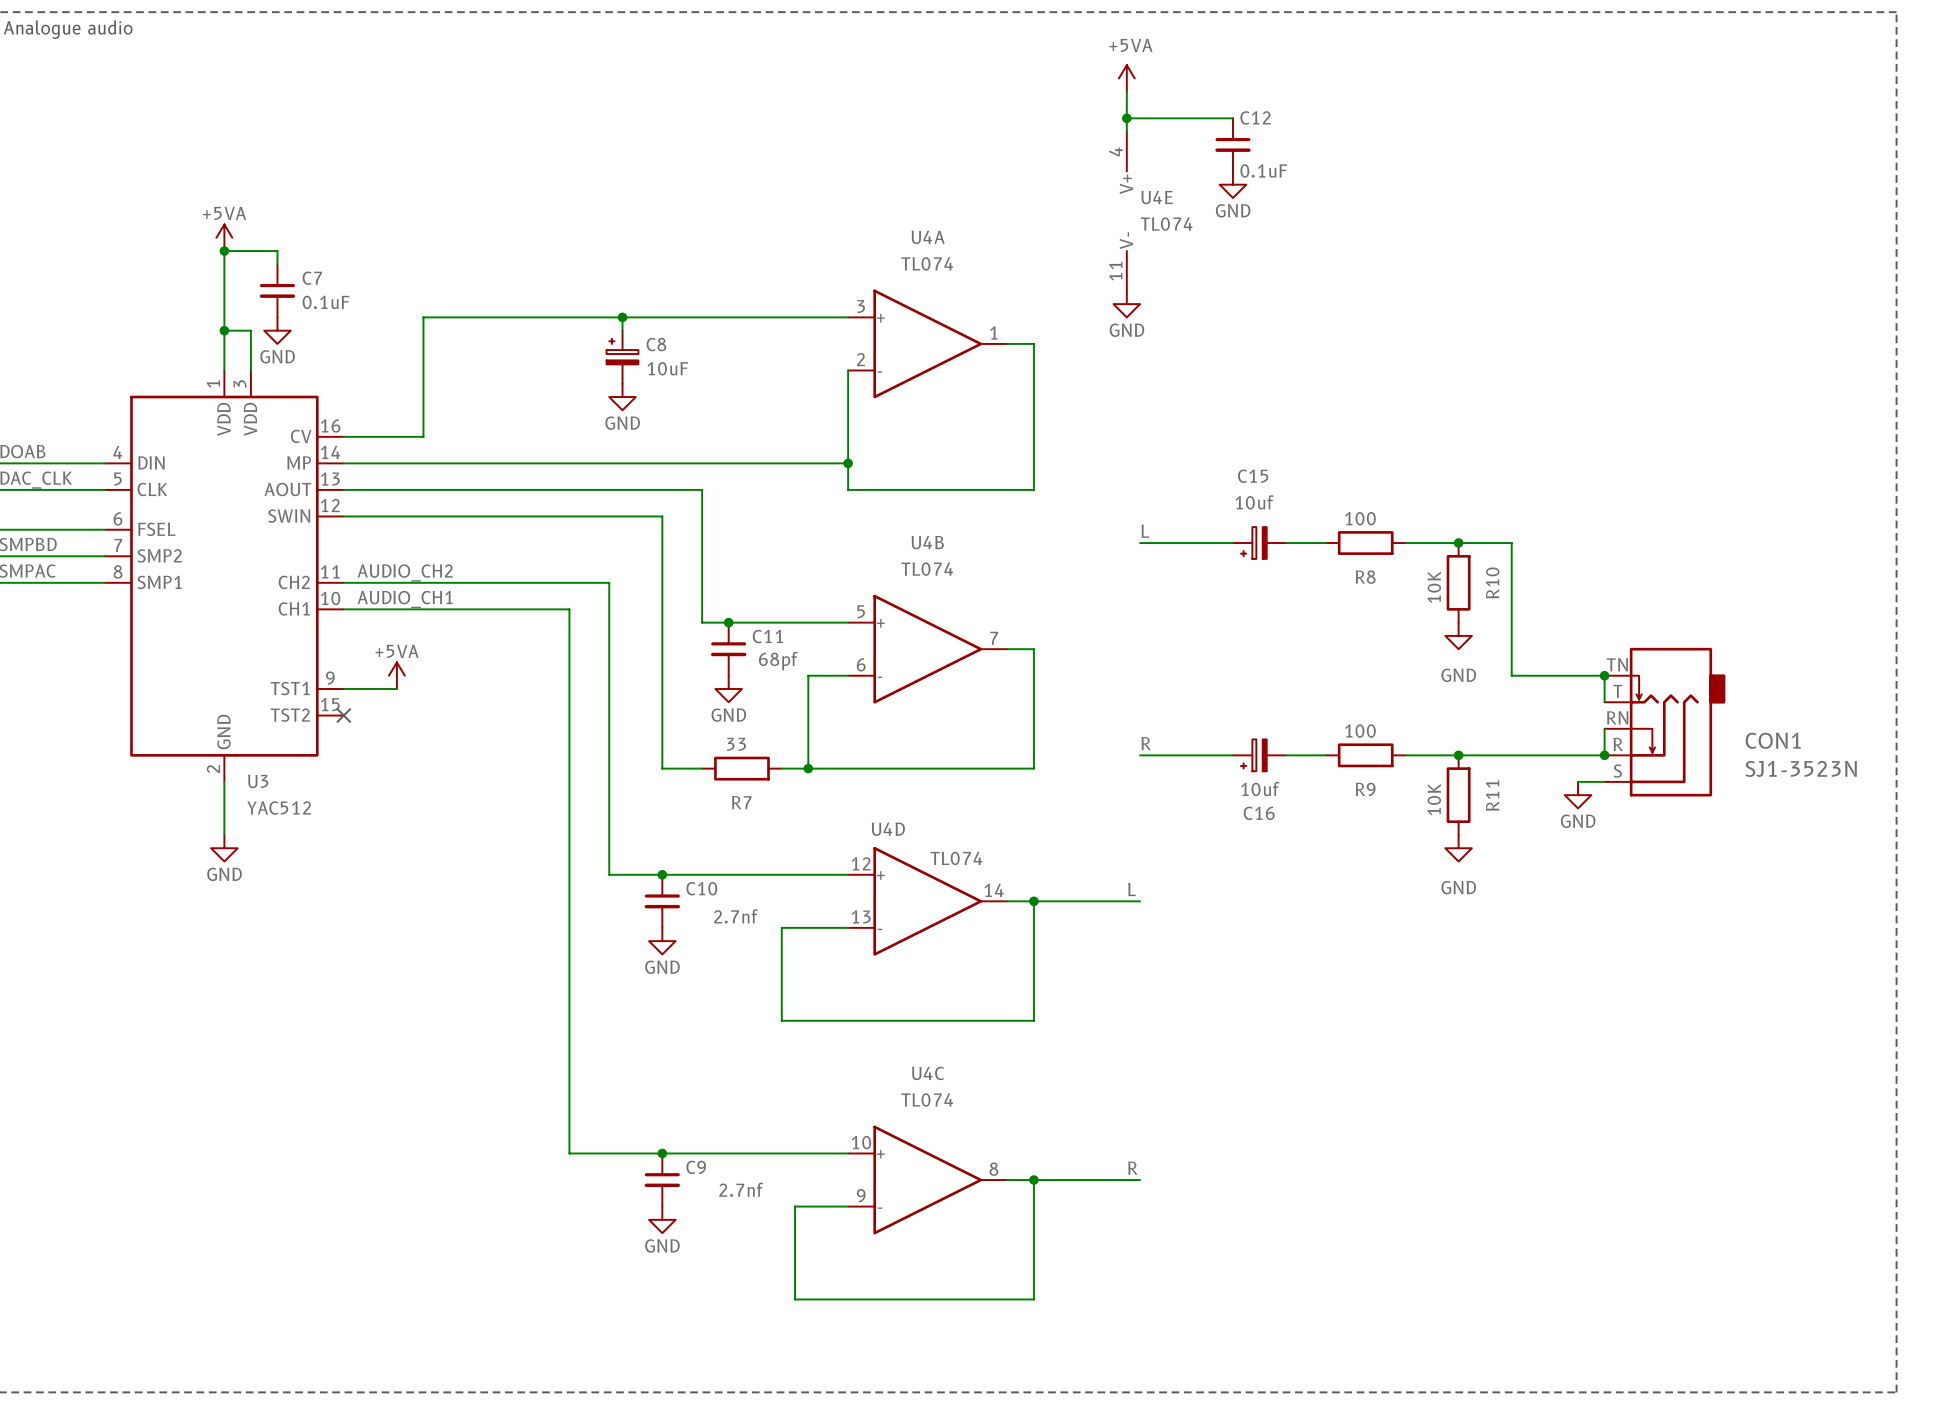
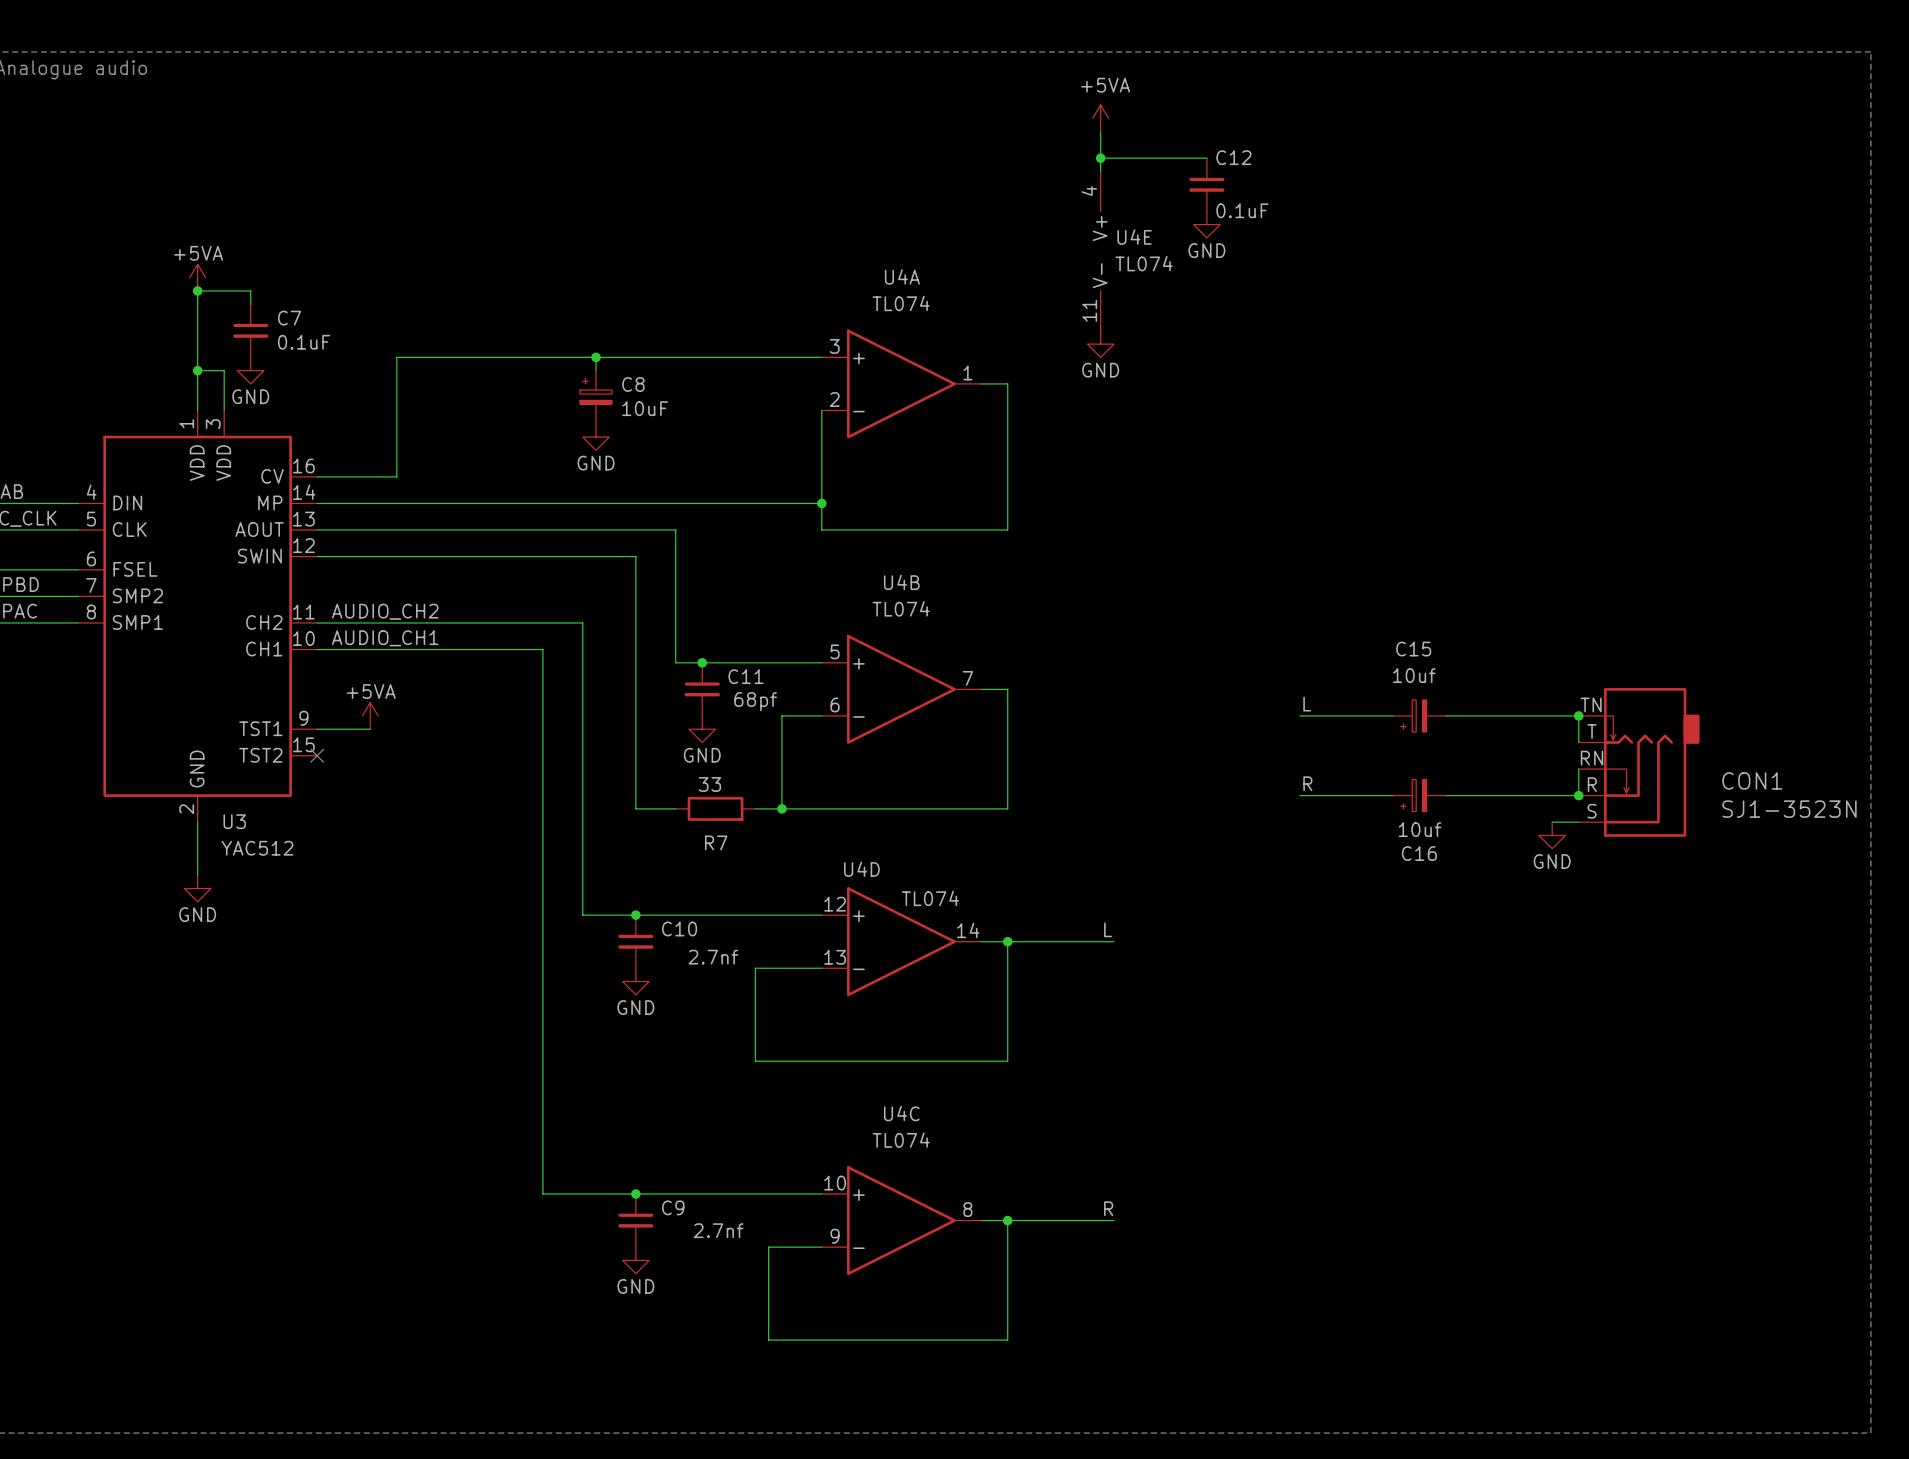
label position: L (1145, 531) -> L (1307, 704)
wire: (1140, 543) (1233, 543) -> none
C15 position: (1259, 543) -> (1419, 715)
wire: (1286, 543) (1325, 543) -> none
R8: 100 (1365, 543) -> none
wire: (1405, 543) (1511, 543) (1511, 675) -> (1445, 715) (1485, 715)
junction: (1458, 543) -> none
R10: 10K (1458, 582) -> none
power symbol: GND (1458, 635) -> none
label position: R (1146, 743) -> R (1307, 783)
wire: (1140, 755) (1233, 755) -> (1299, 715) (1392, 715)
C16 position: (1259, 755) -> (1419, 795)
wire: (1286, 755) (1325, 755) -> (1379, 795) (1299, 795)
R9: 100 (1365, 755) -> none
junction: (1458, 755) -> none
R11: 10K (1458, 795) -> none
power symbol: GND (1458, 848) -> none

